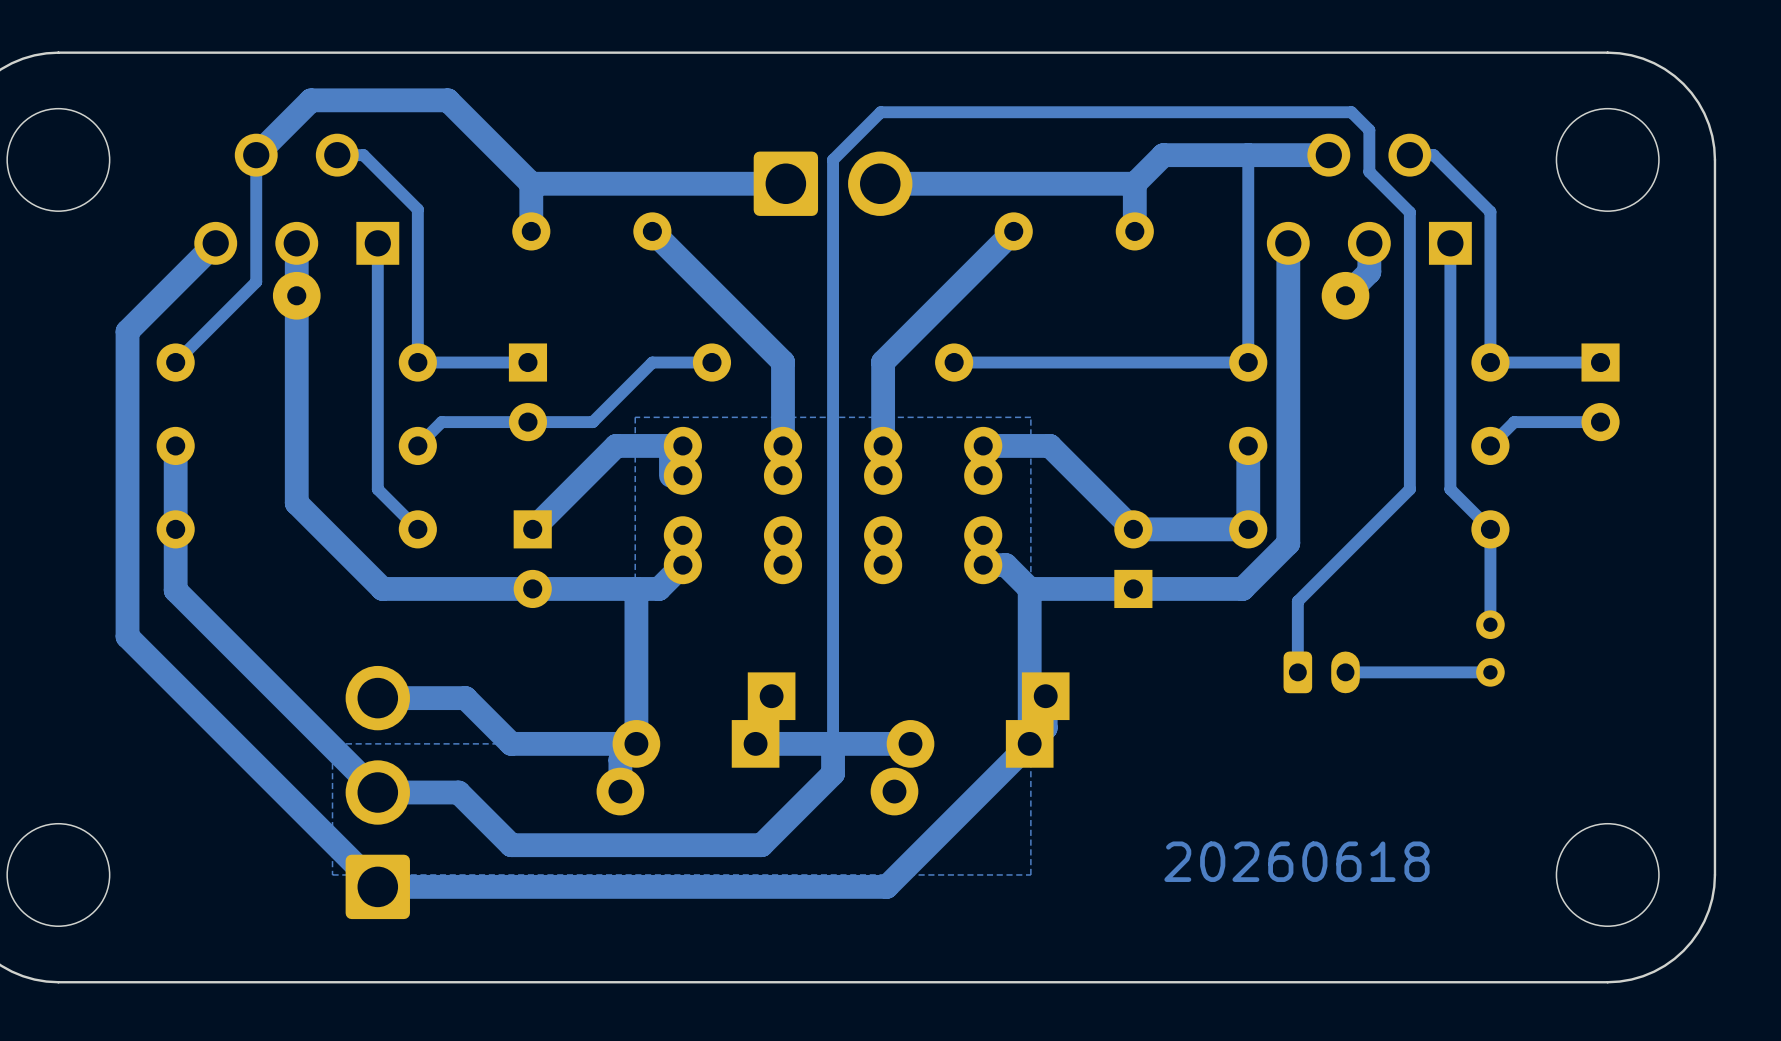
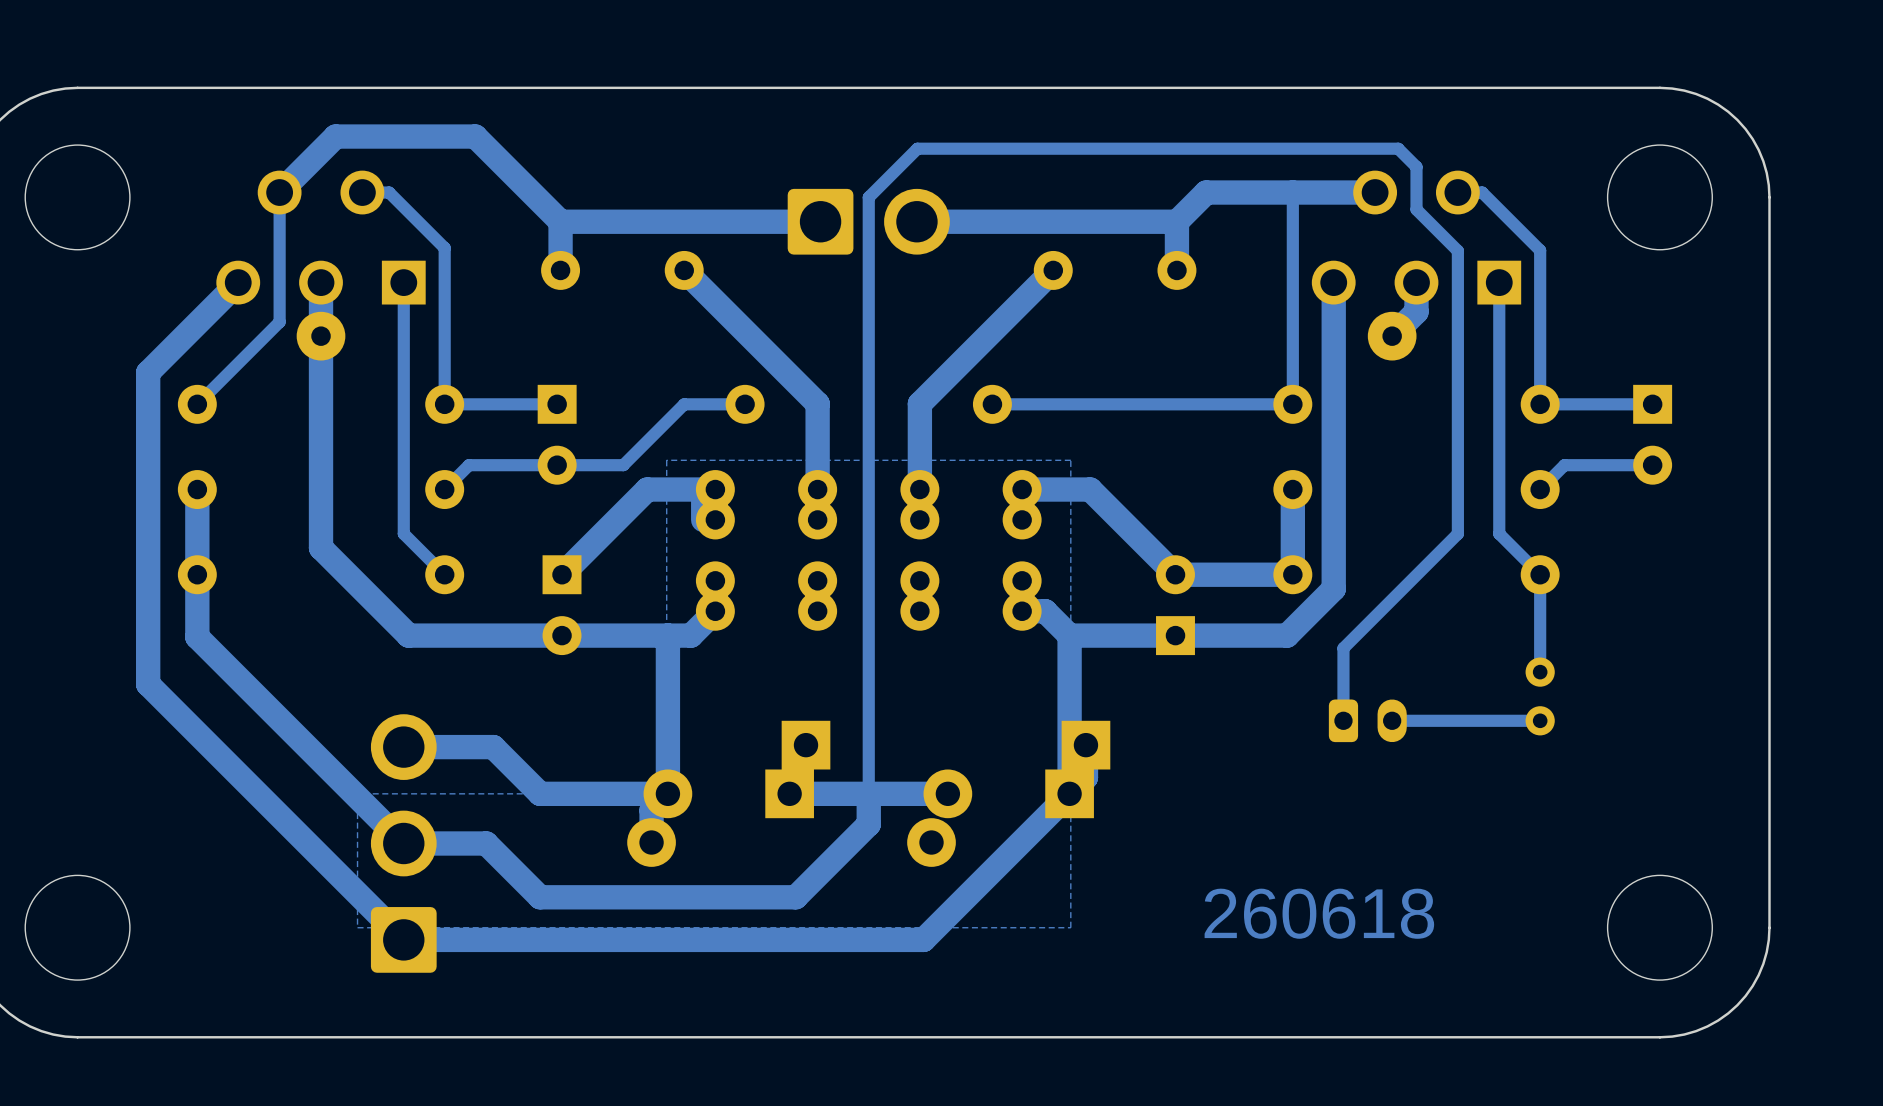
text: 20260618 (1296, 861) -> 260618 (1319, 913)

